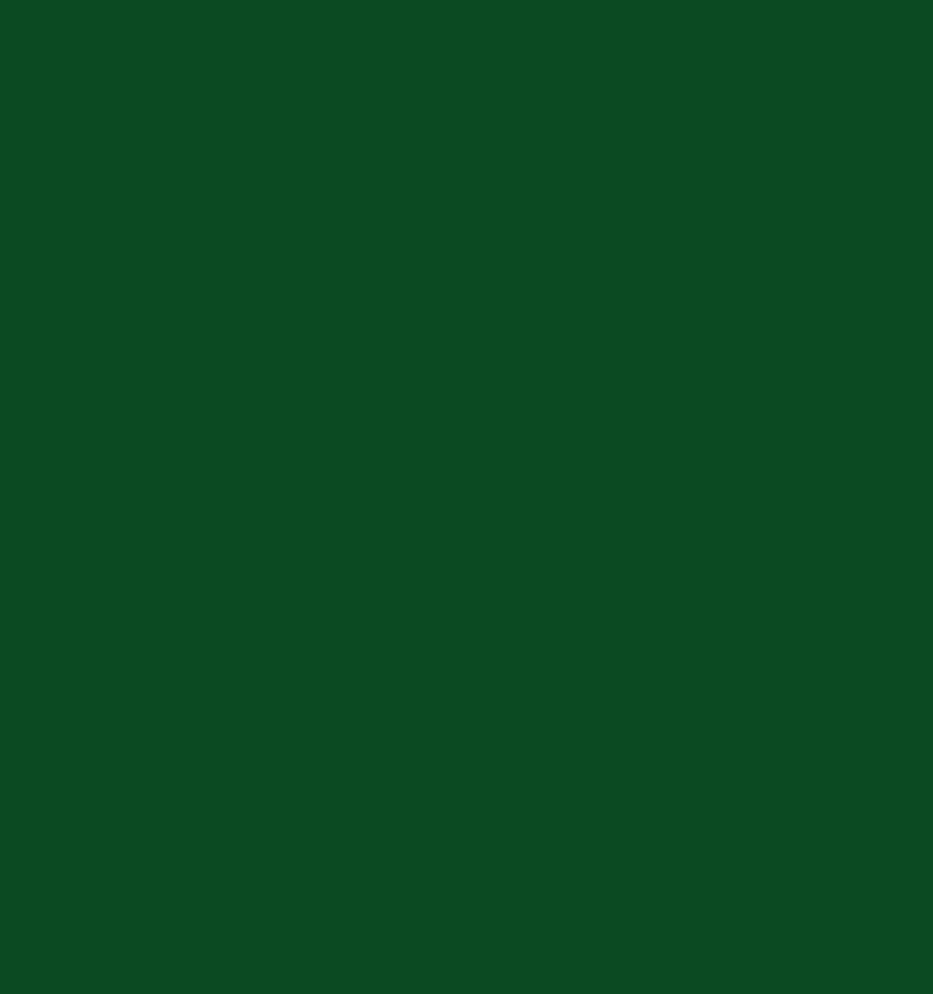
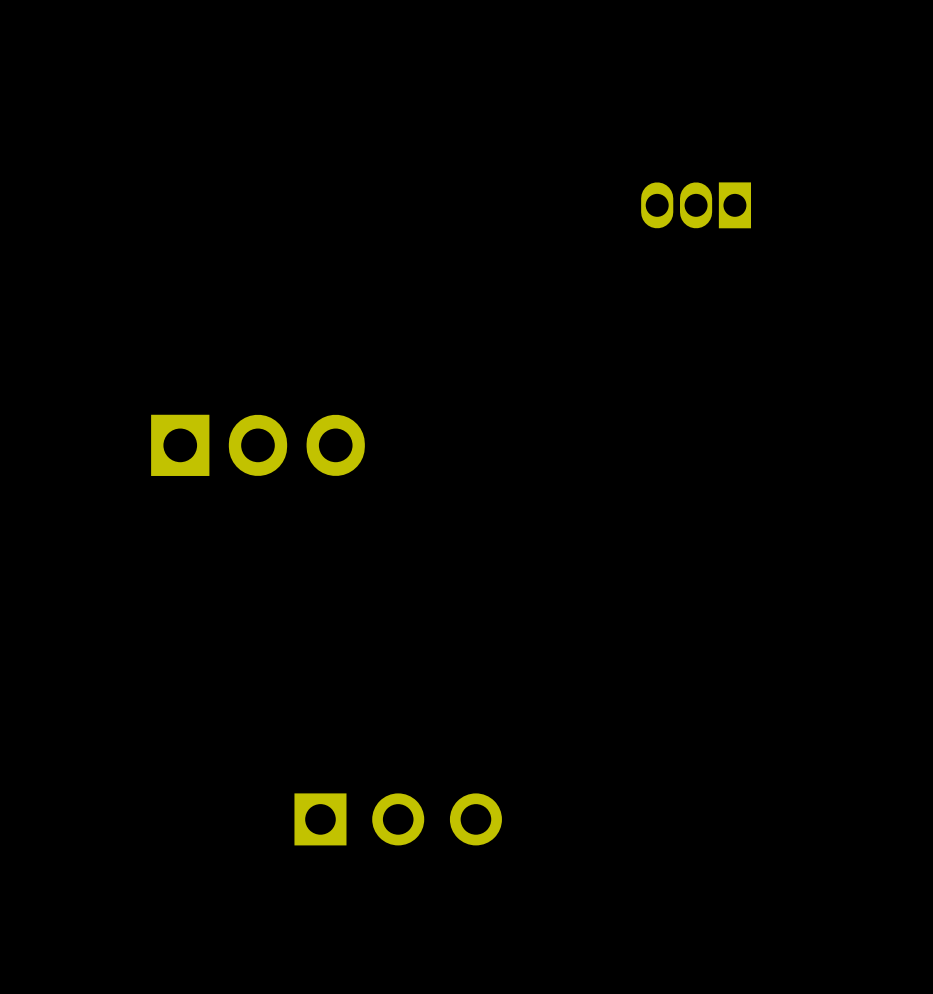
part: none -> (696, 205)
part: none -> (257, 445)
part: none -> (398, 819)

